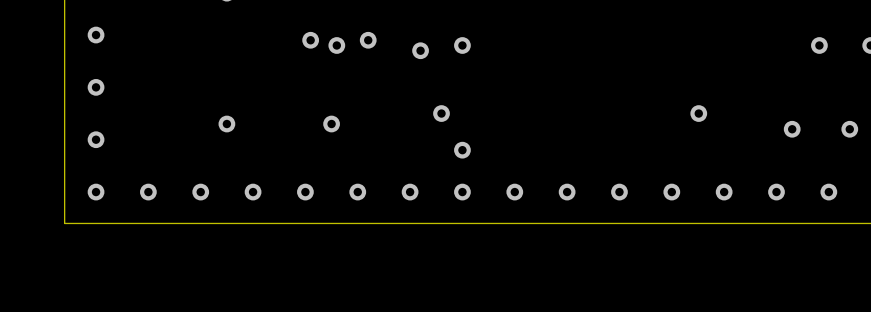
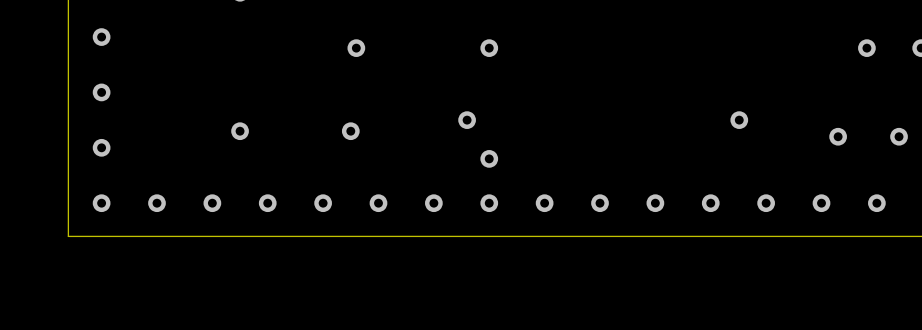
via: (310, 40) -> none
via: (368, 40) -> none
via: (420, 50) -> none

